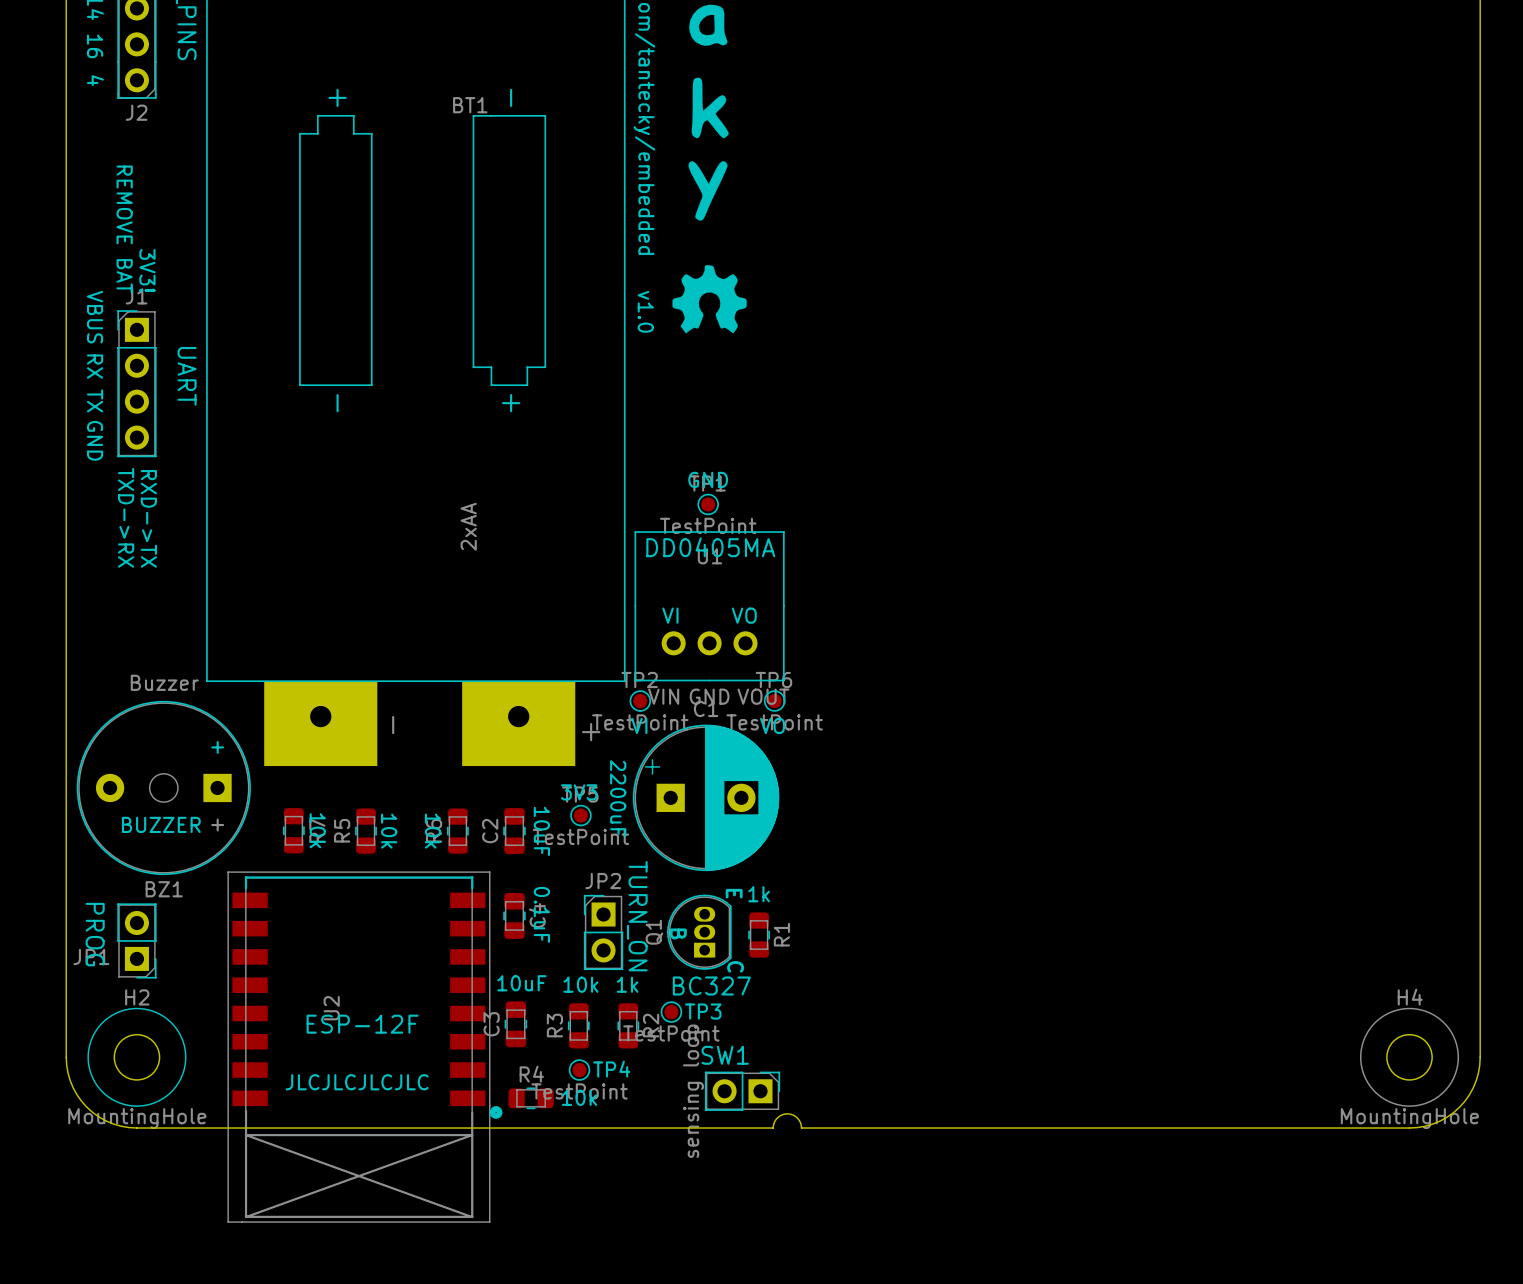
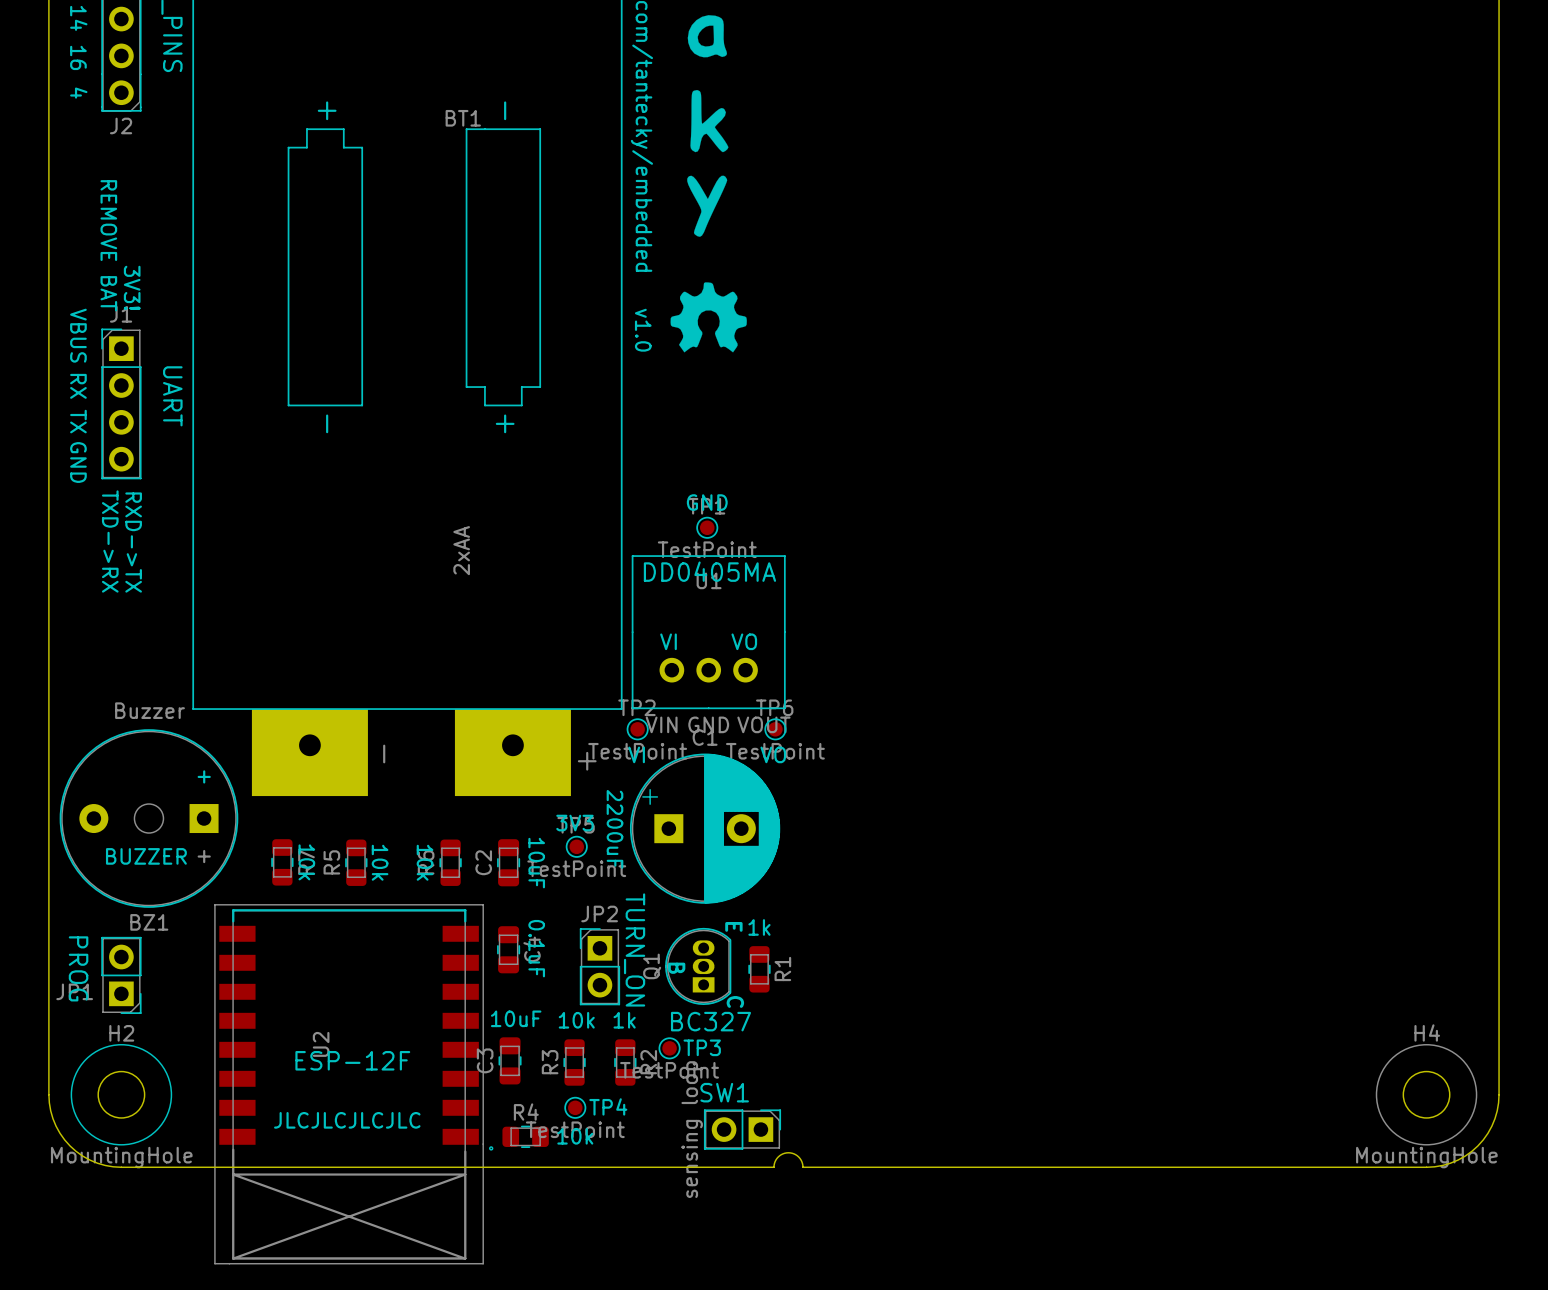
drawing shape: [489, 1106, 503, 1119] -> [489, 1146, 494, 1151]

